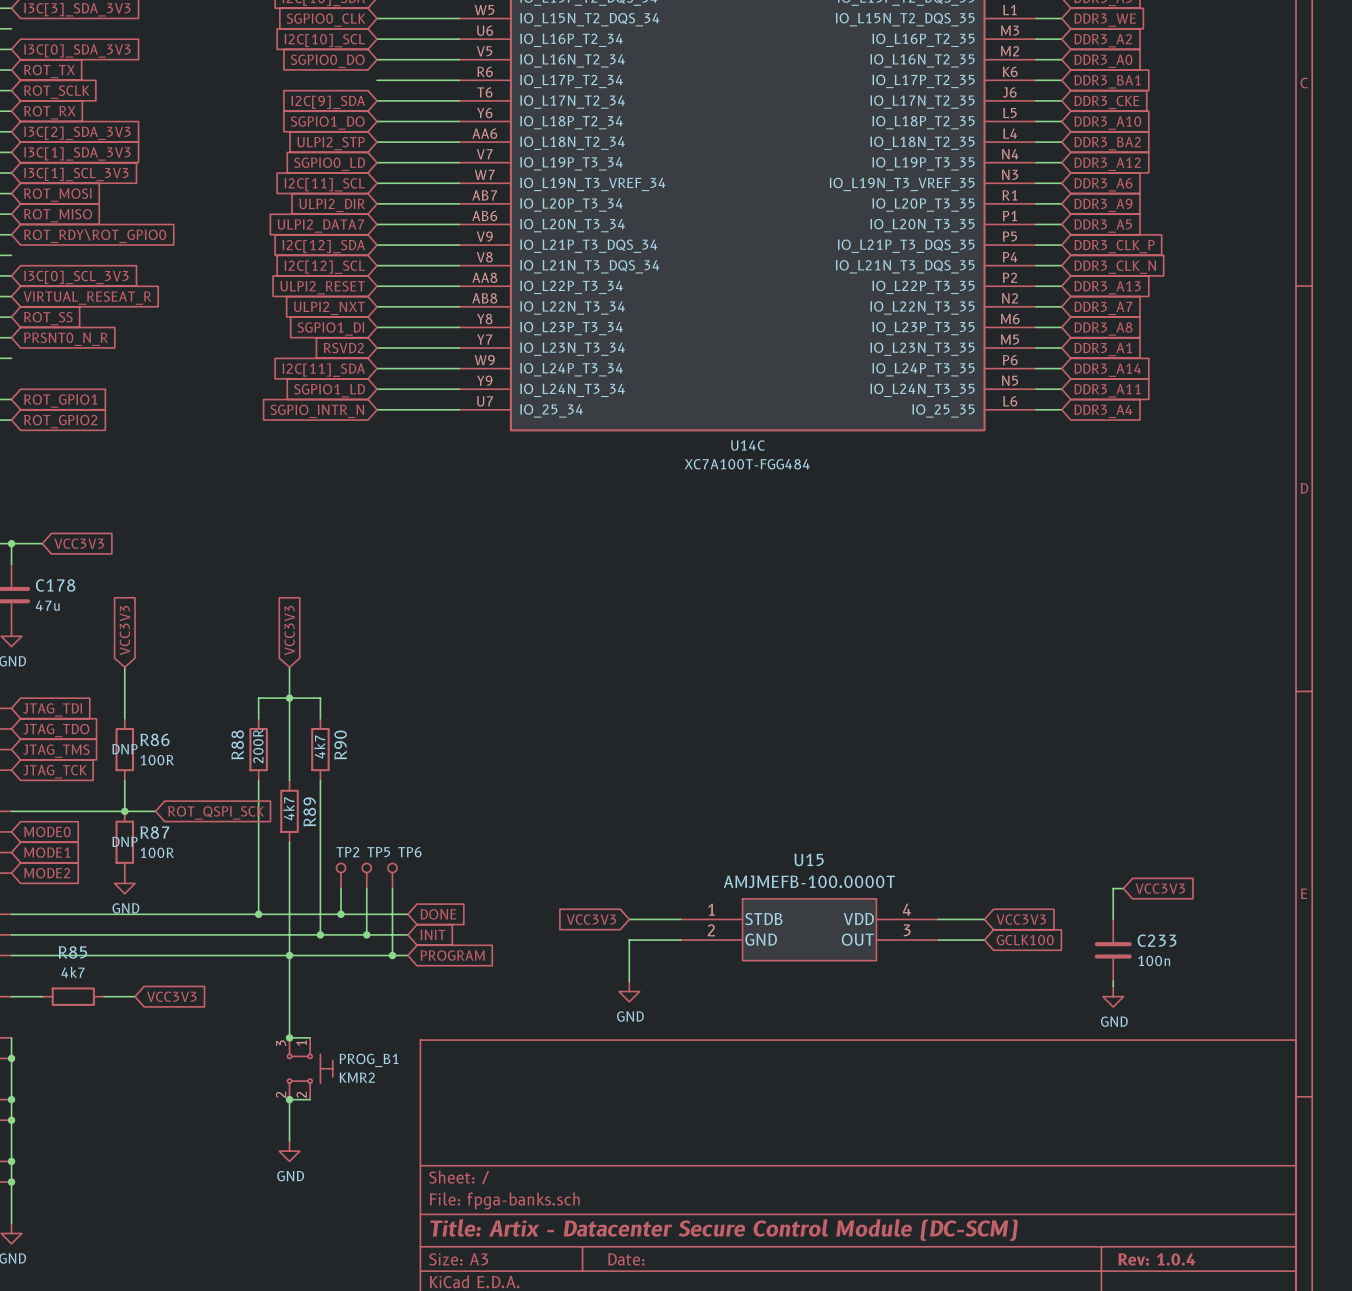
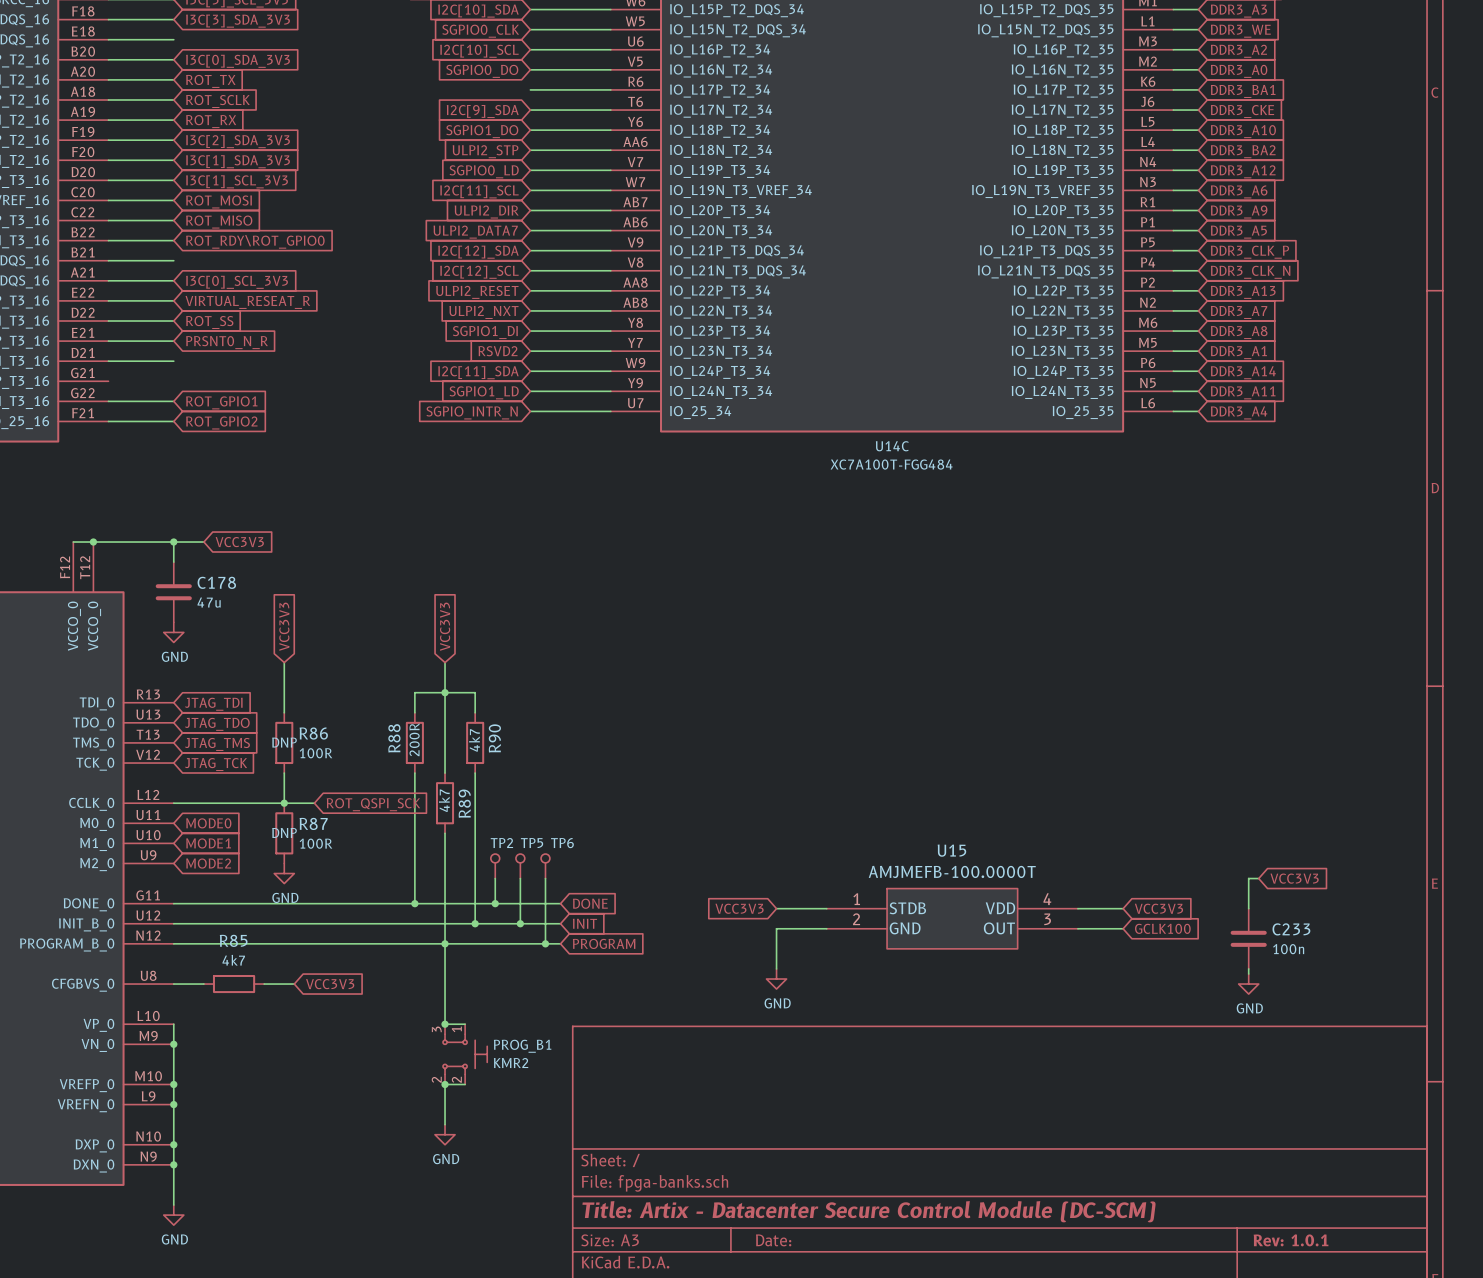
title block: Rev: 1.0.4 (1156, 1259) -> Rev: 1.0.1 (1291, 1240)

